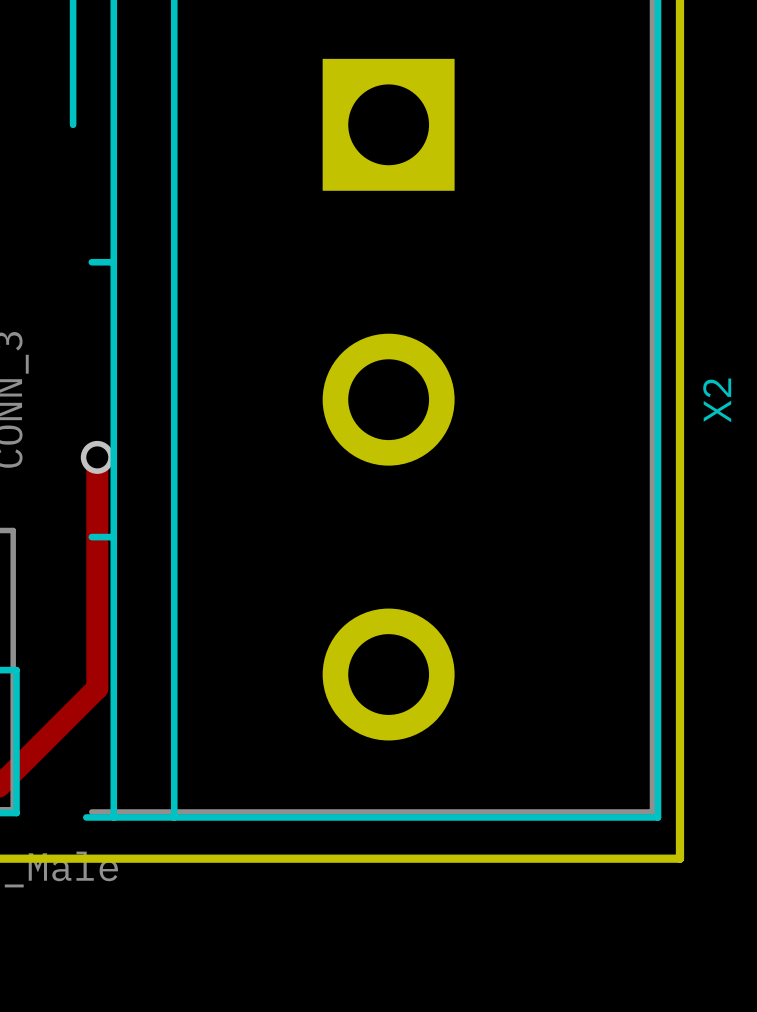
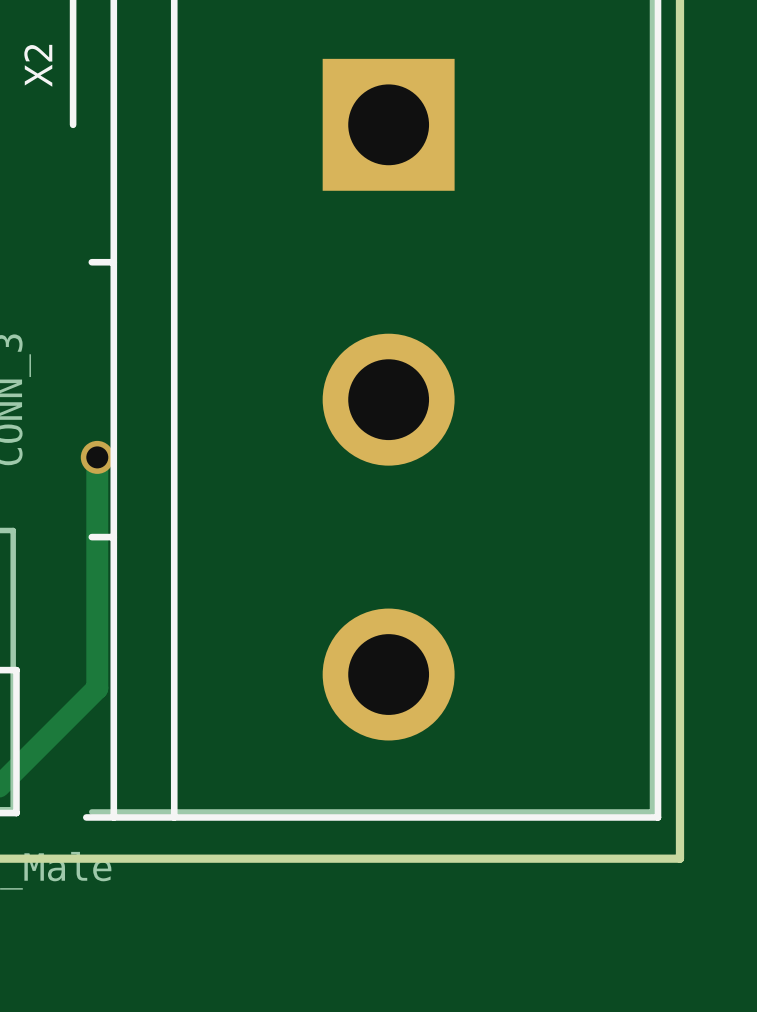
X2 name position: X2 (717, 400) -> X2 (38, 65)

